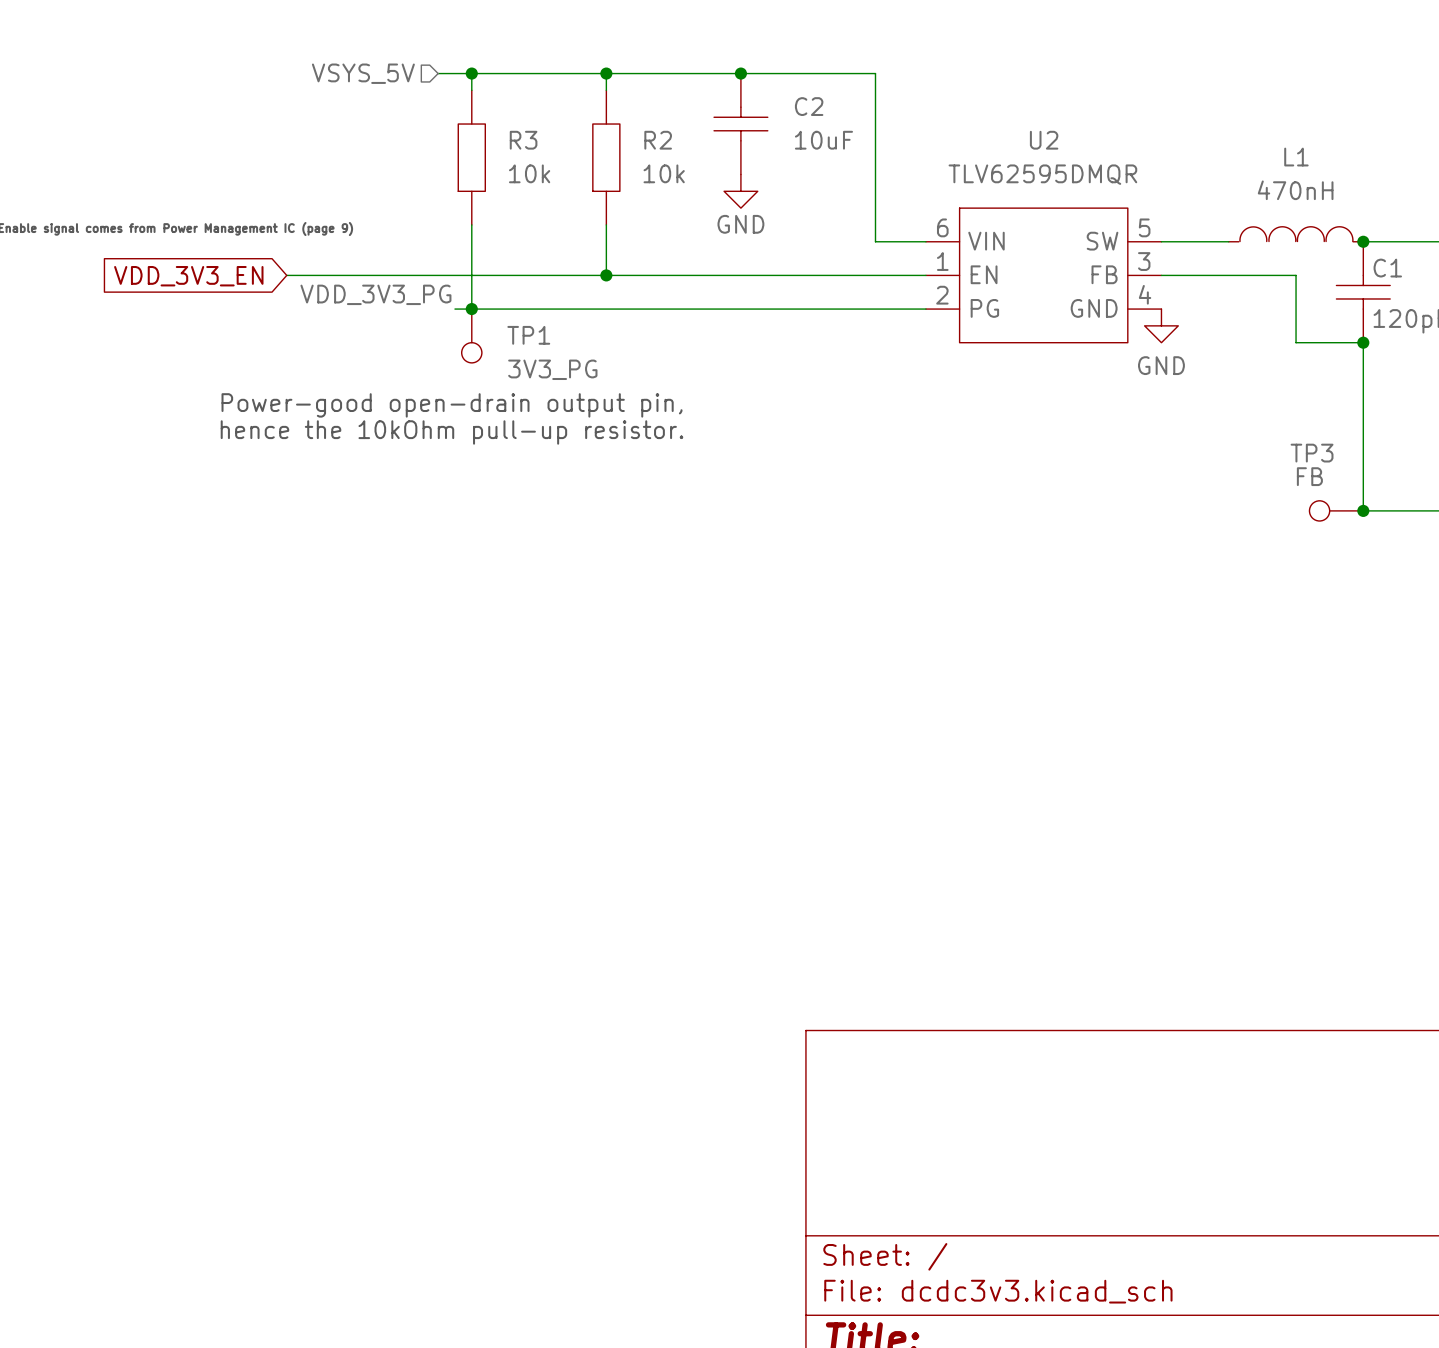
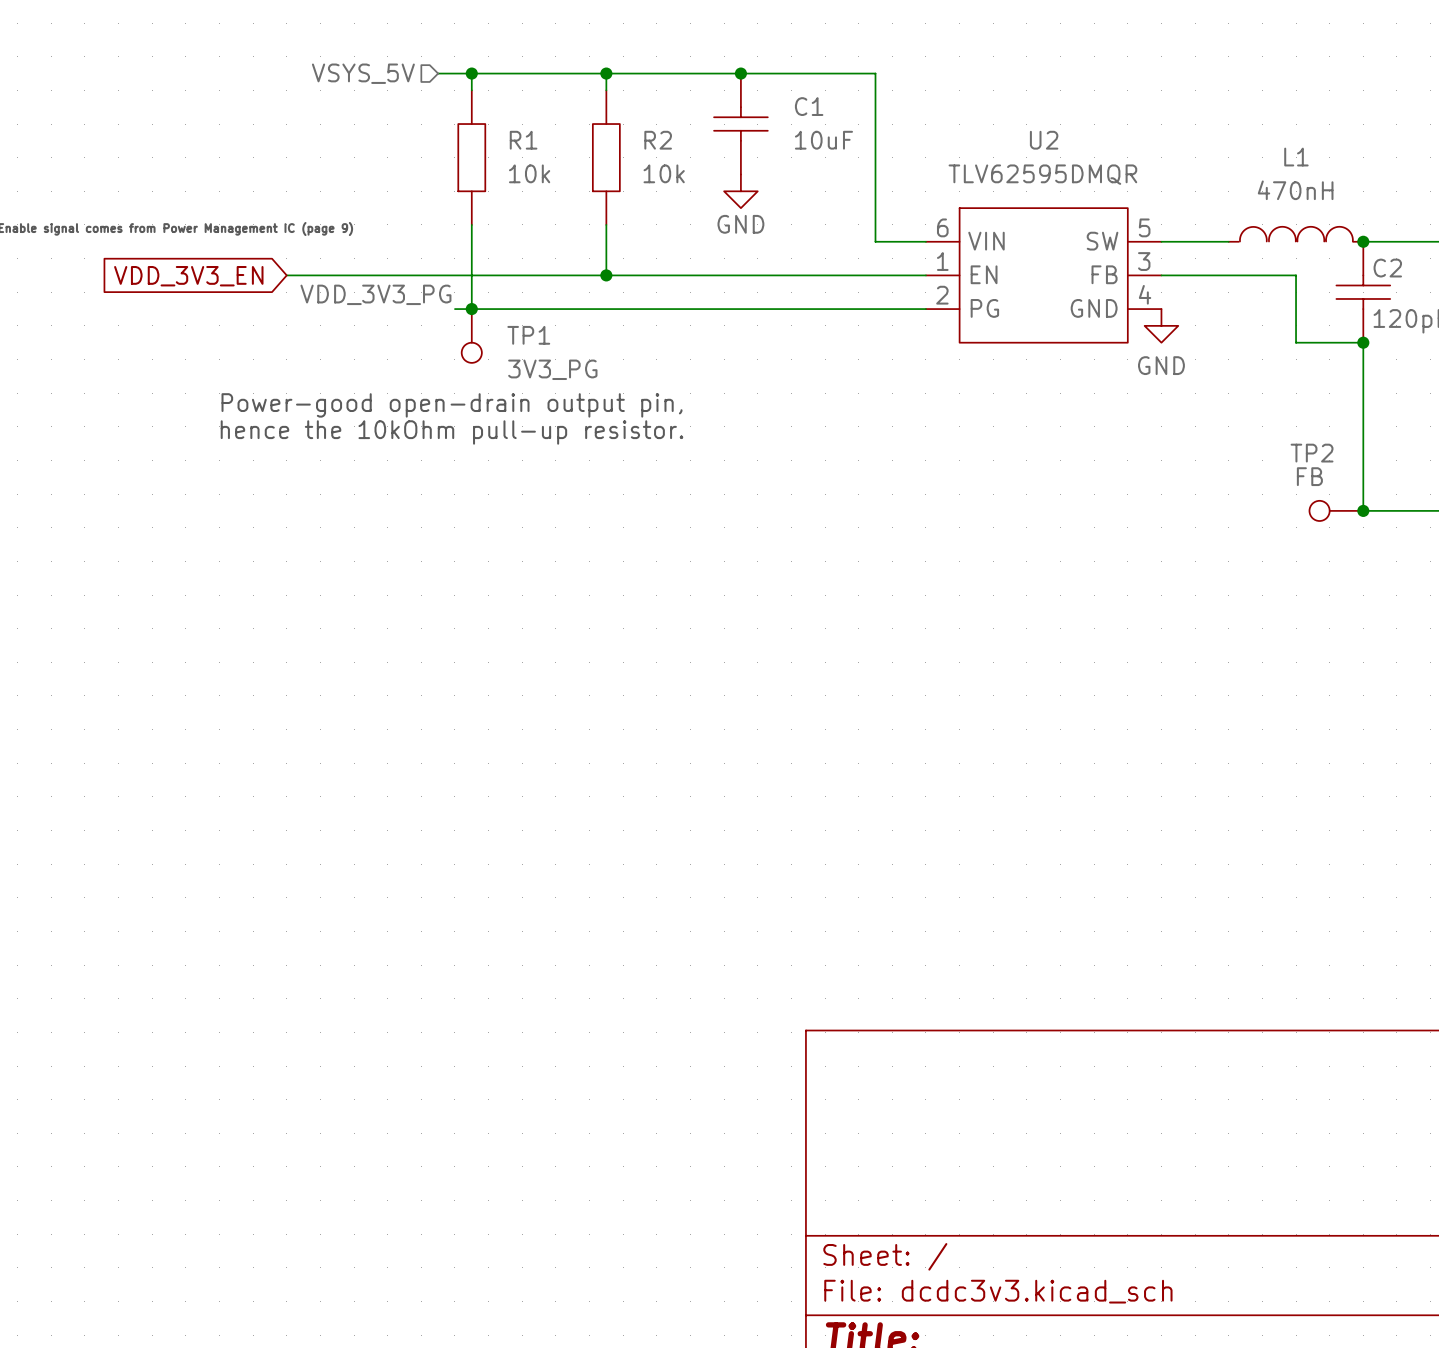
C2 name: C2 (809, 106) -> C1 (809, 106)
R3 name: R3 (523, 140) -> R1 (523, 140)
C1 name: C1 (1387, 268) -> C2 (1387, 268)
TP3 name: TP3 (1312, 453) -> TP2 (1312, 453)

